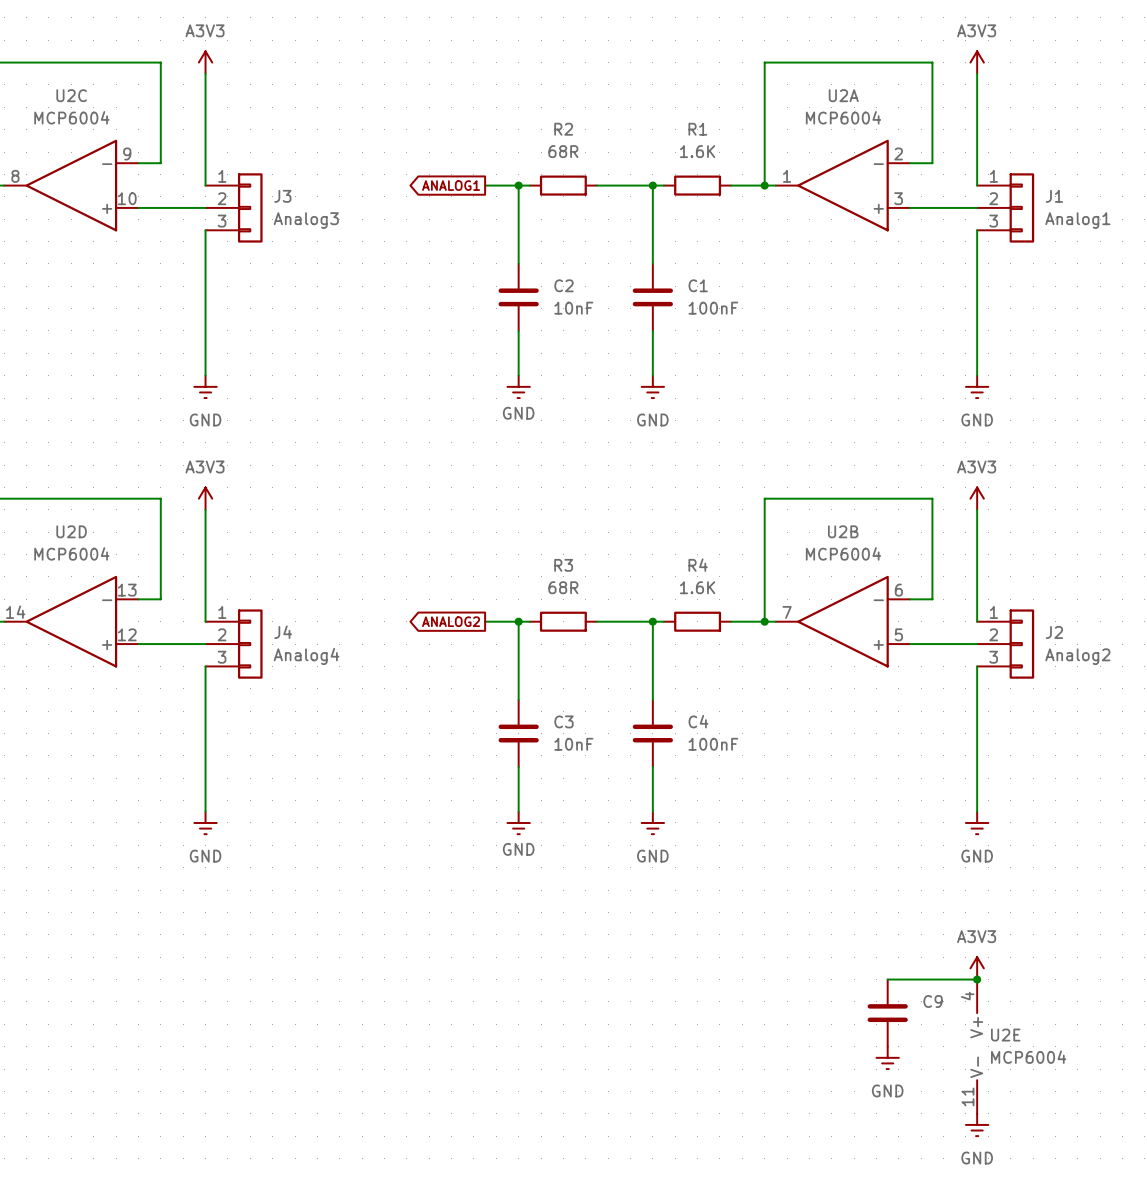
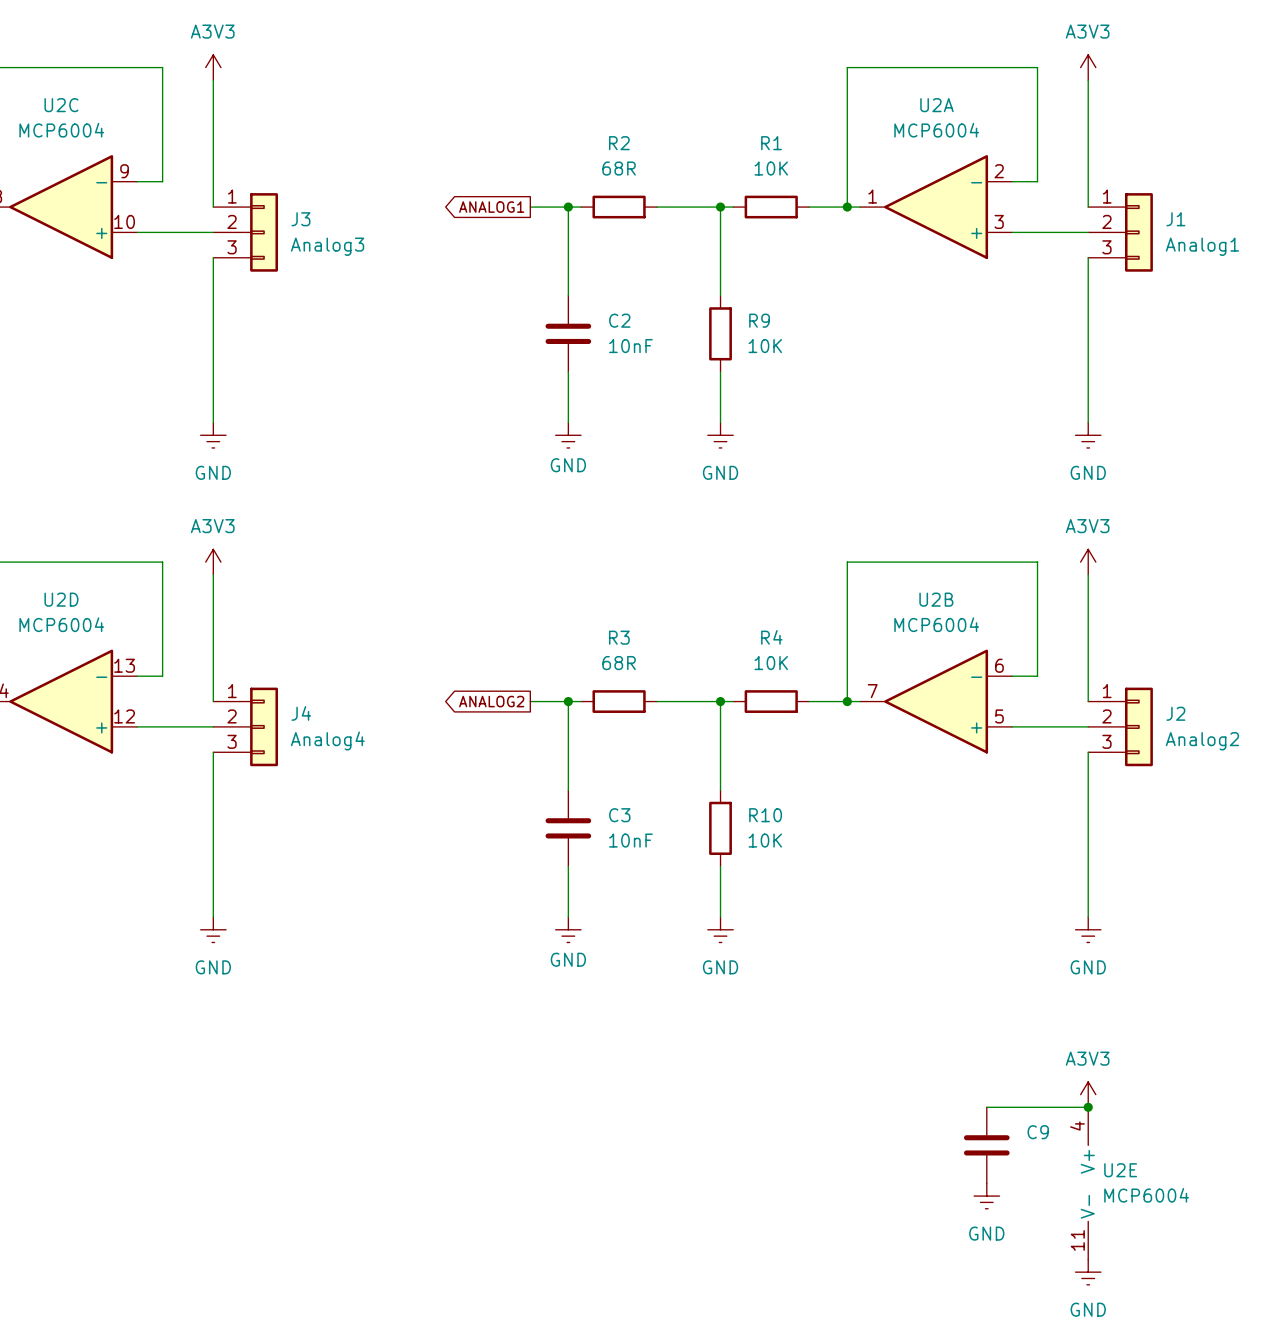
R1 value: 1.6K (697, 151) -> 10K (771, 168)
C1: 100nF (652, 297) -> none
R9: none -> 10K (720, 333)
R4 value: 1.6K (697, 587) -> 10K (771, 663)
C4: 100nF (652, 733) -> none
R10: none -> 10K (720, 828)

